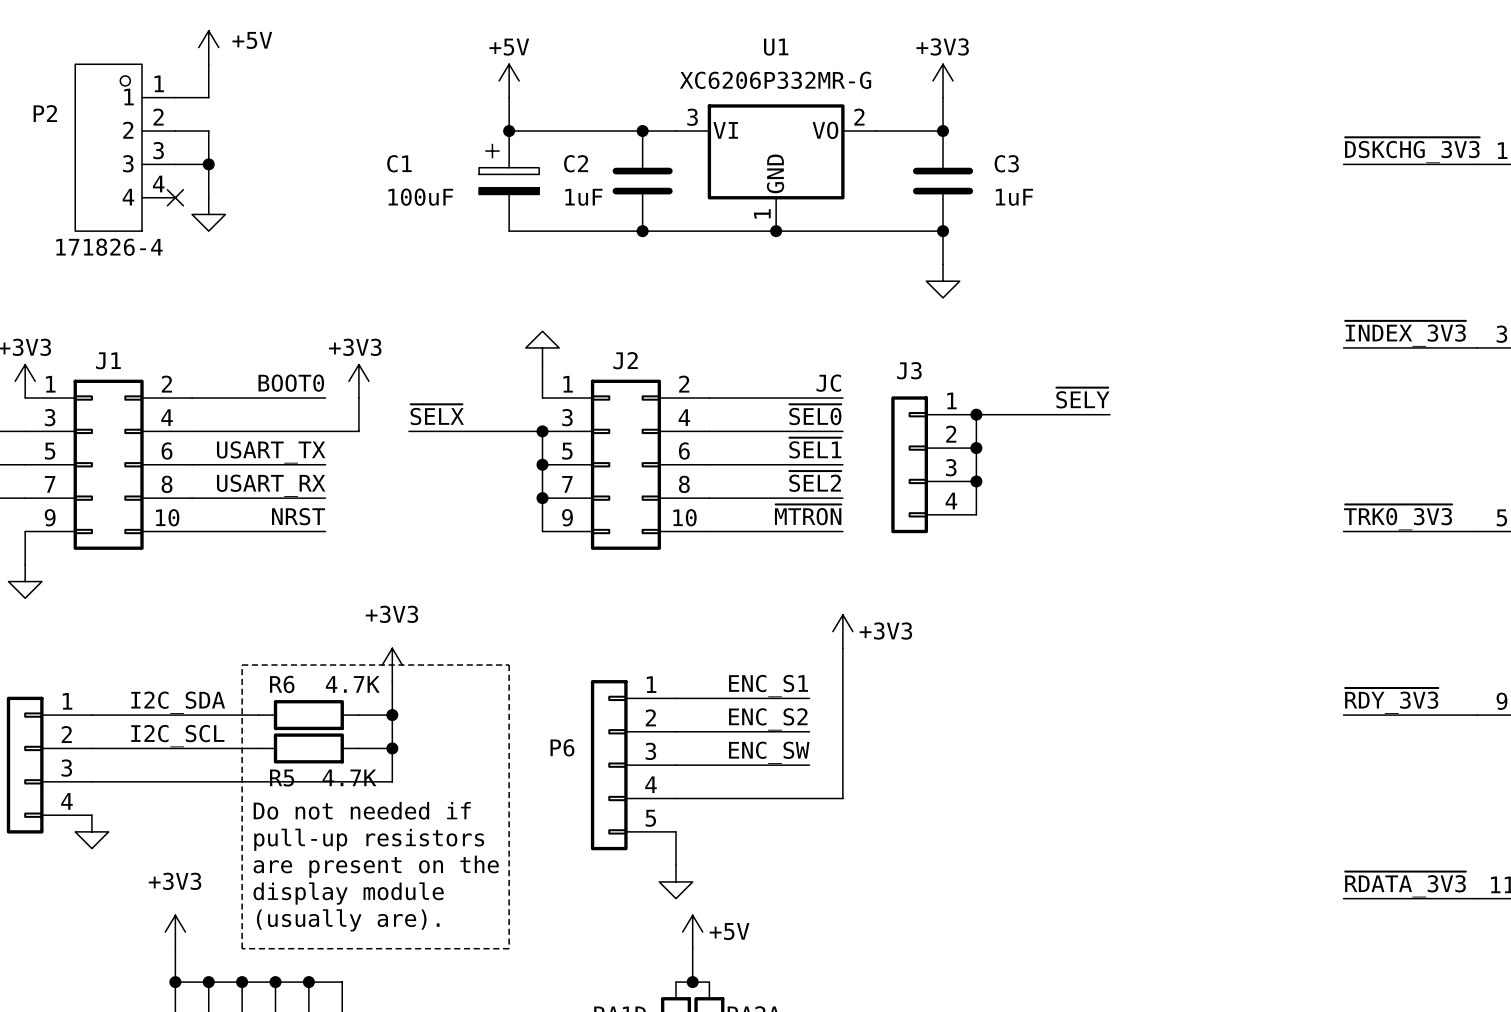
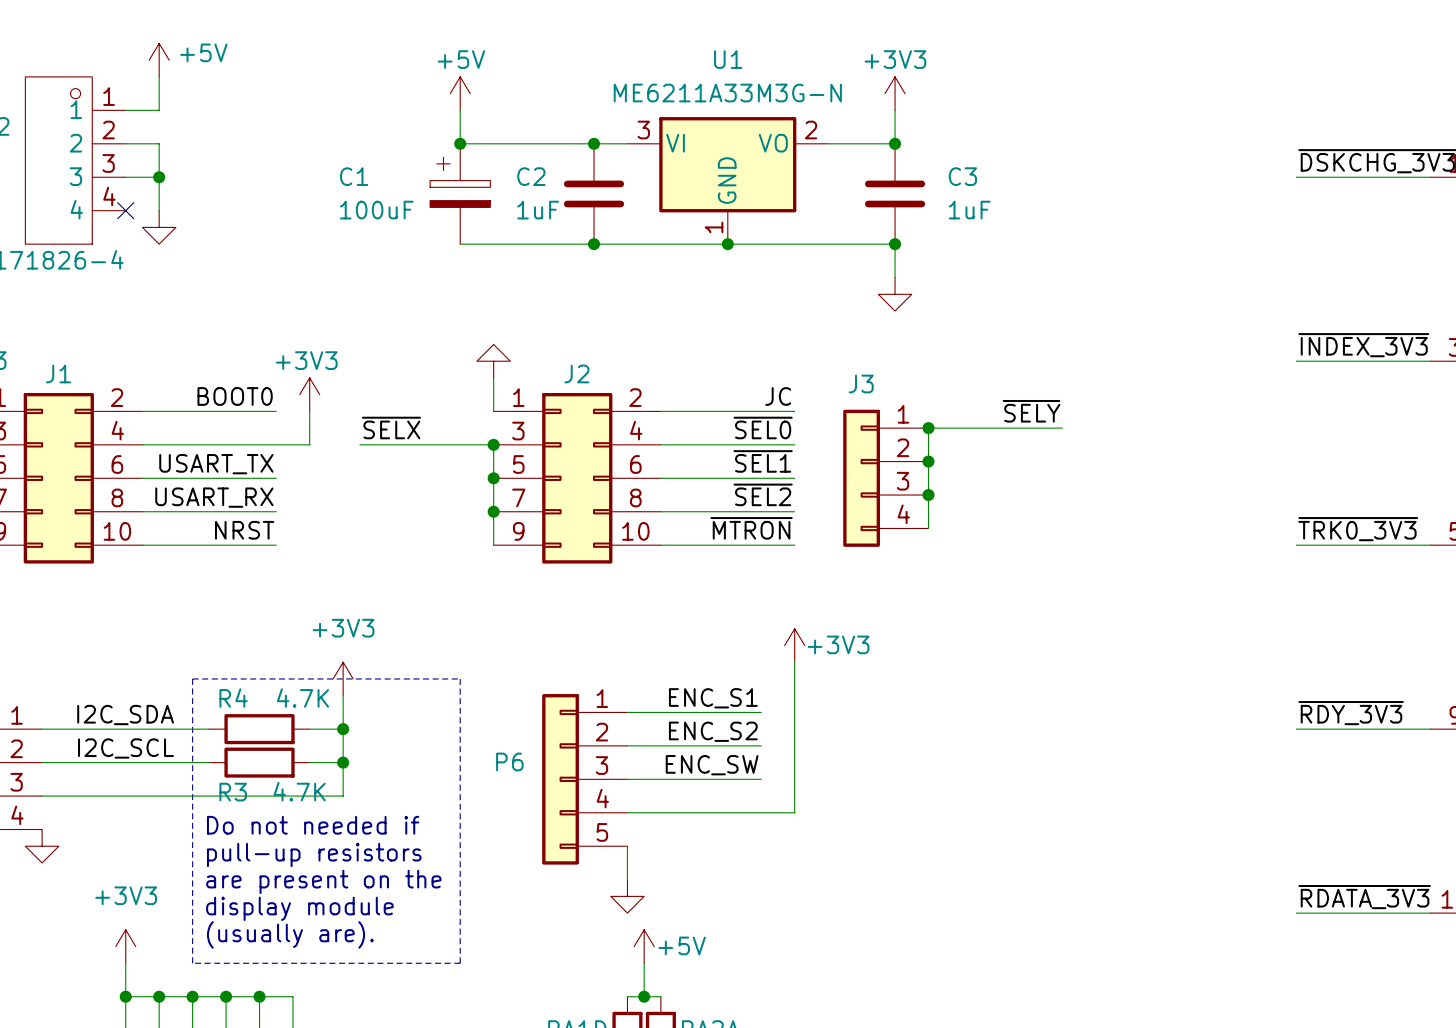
U1 value: XC6206P332MR-G (775, 80) -> ME6211A33M3G-N (727, 93)
R6 name: R6 (282, 684) -> R4 (233, 698)
R5 name: R5 (282, 778) -> R3 (233, 792)

